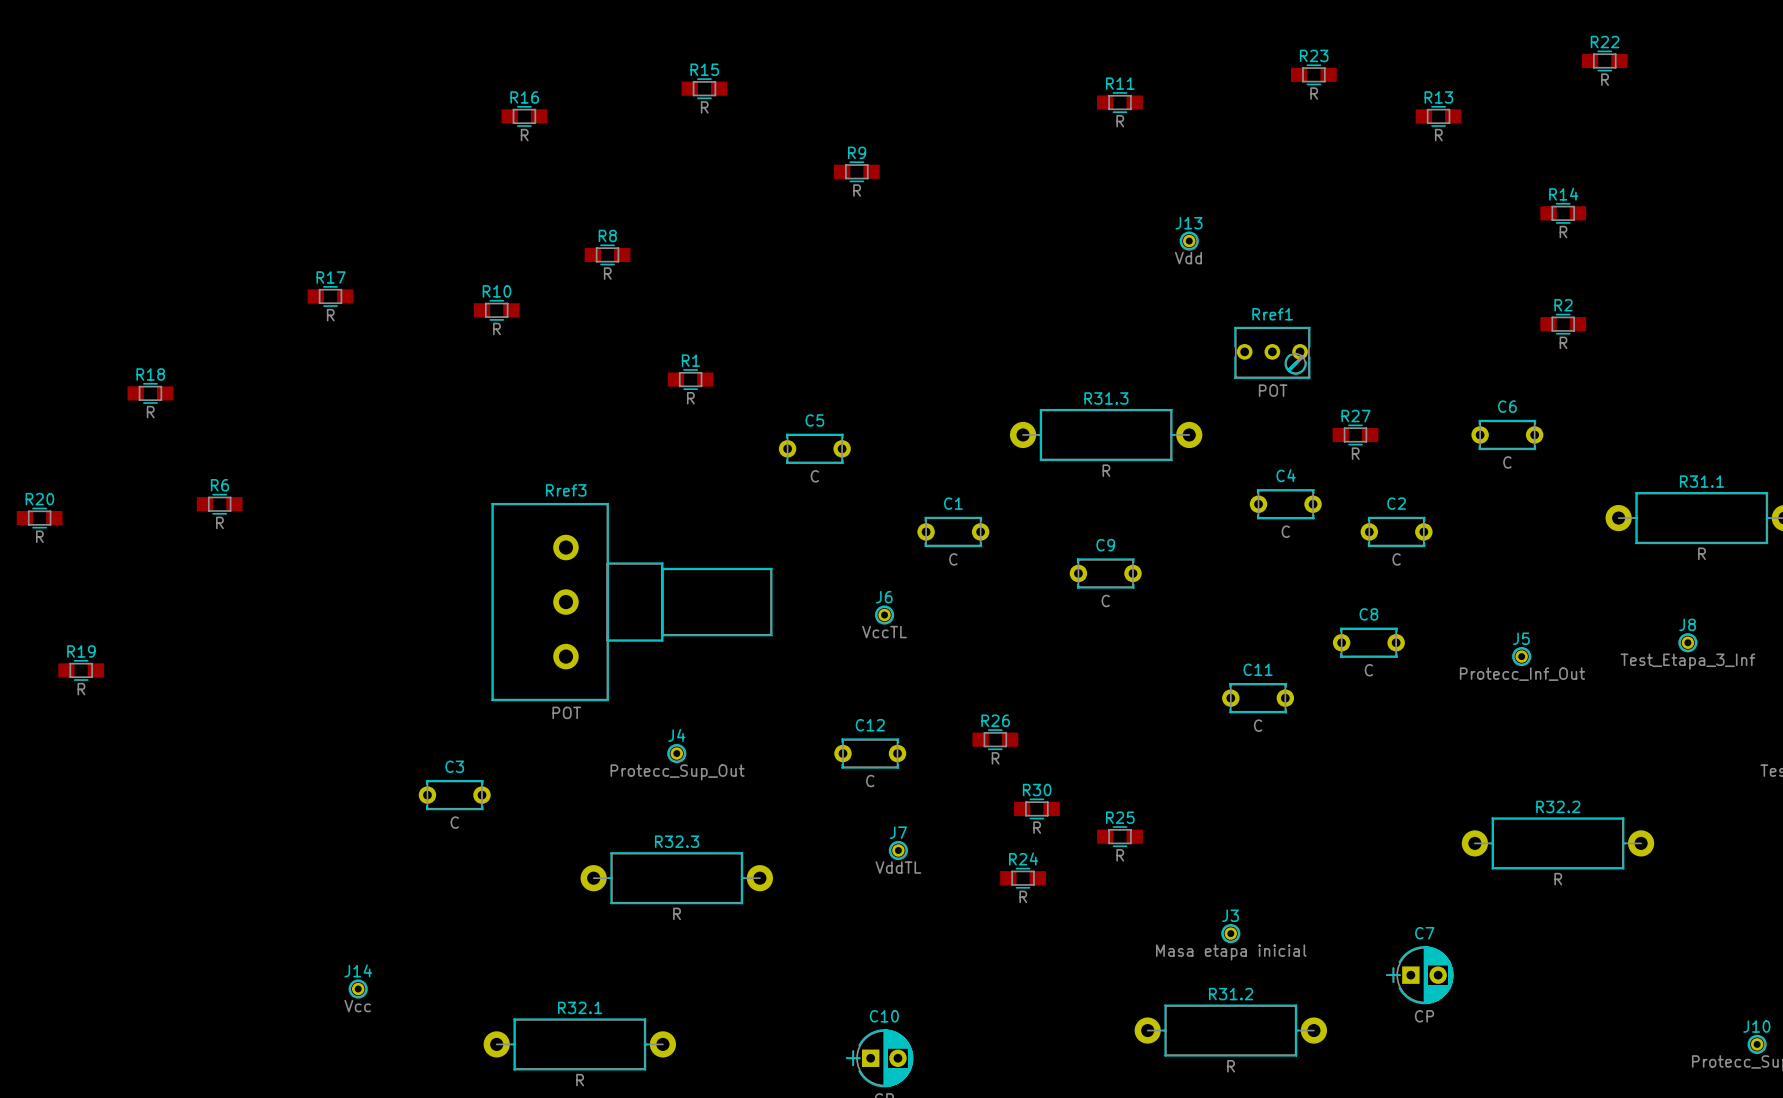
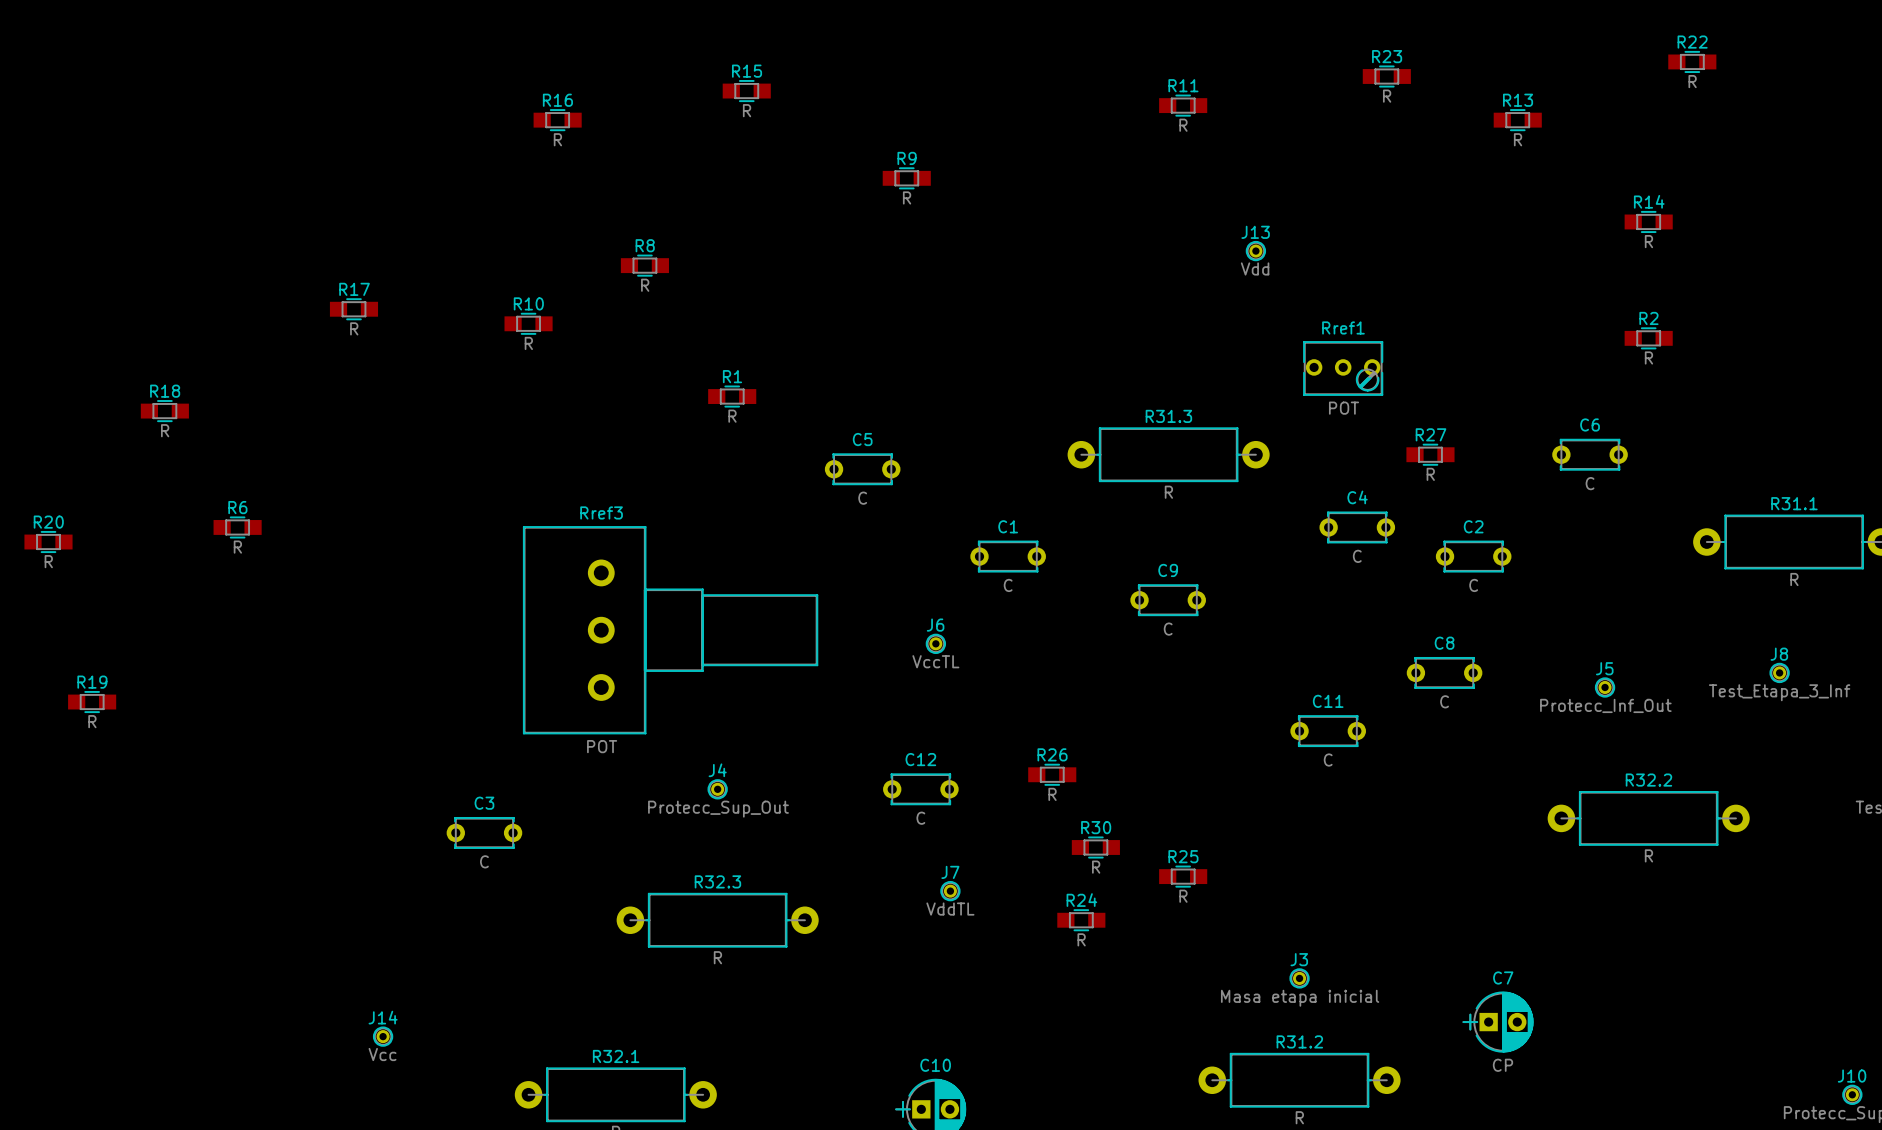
R32.2 position: (1557, 843) -> (1648, 818)

